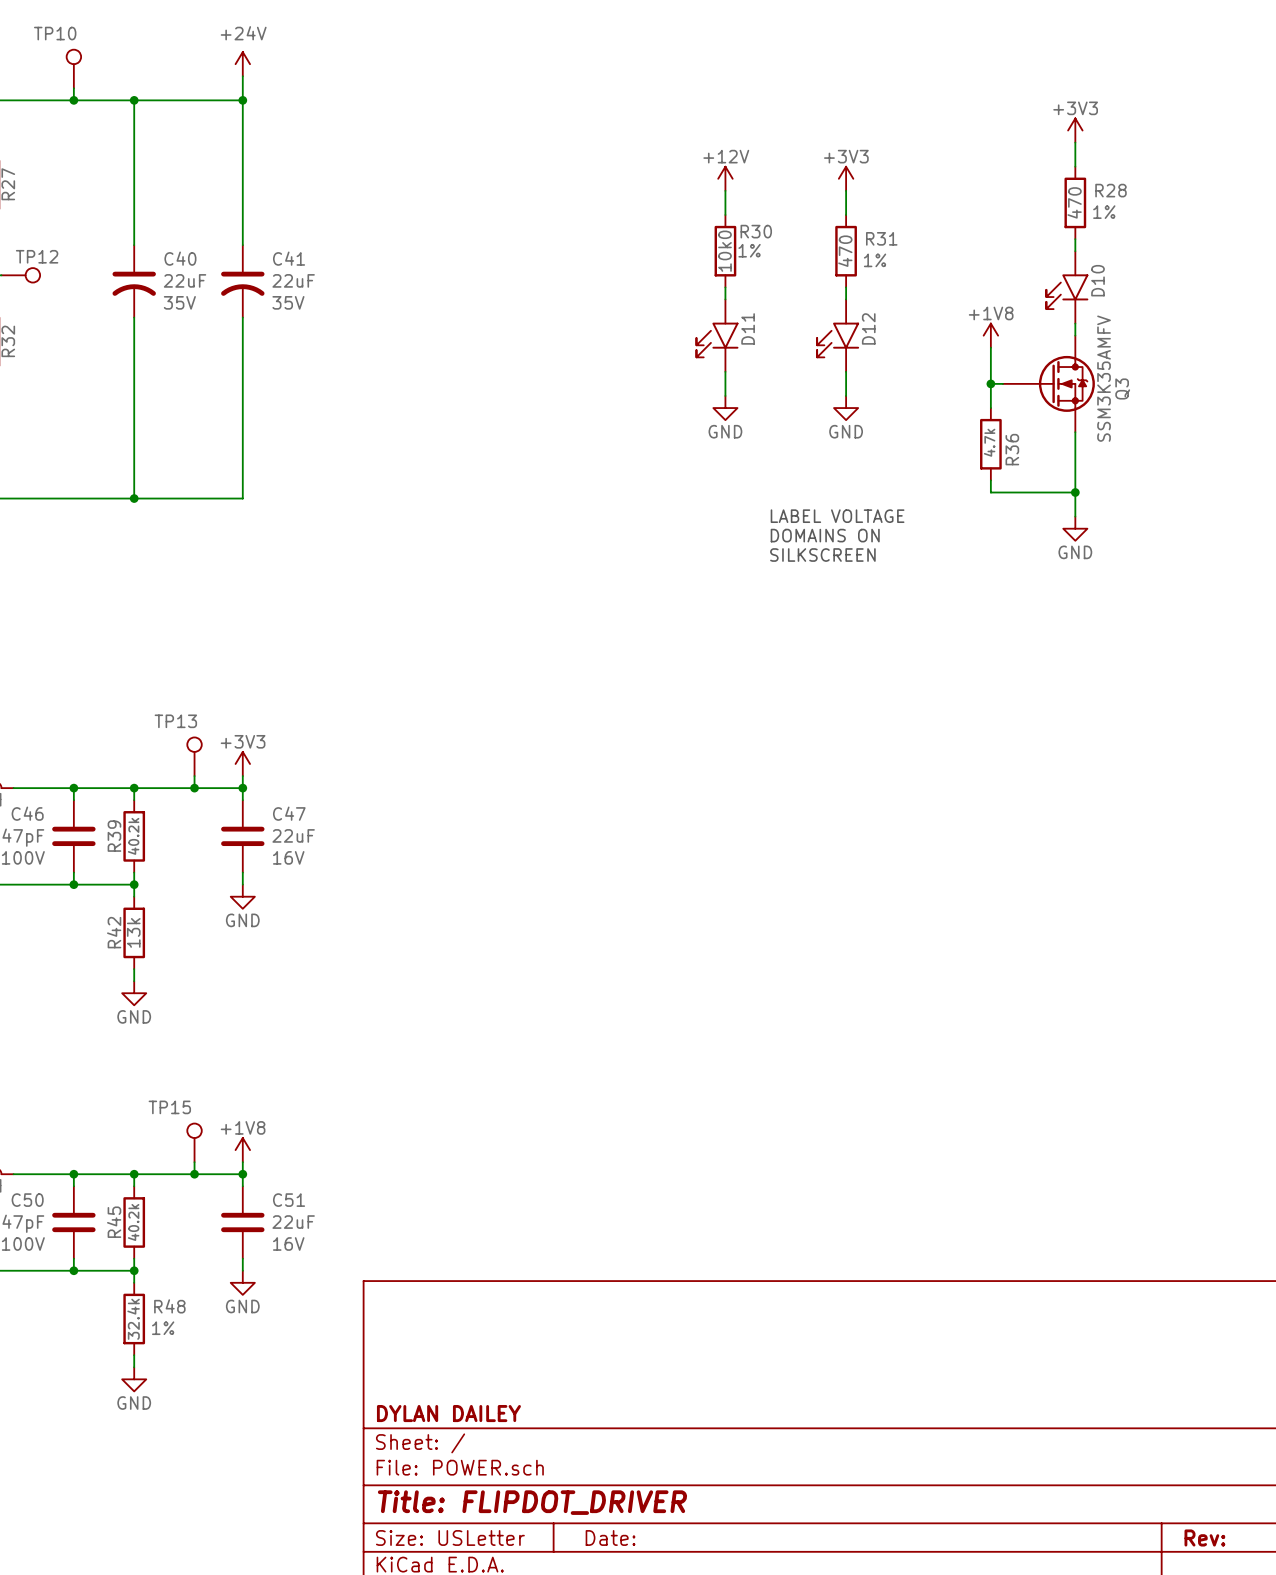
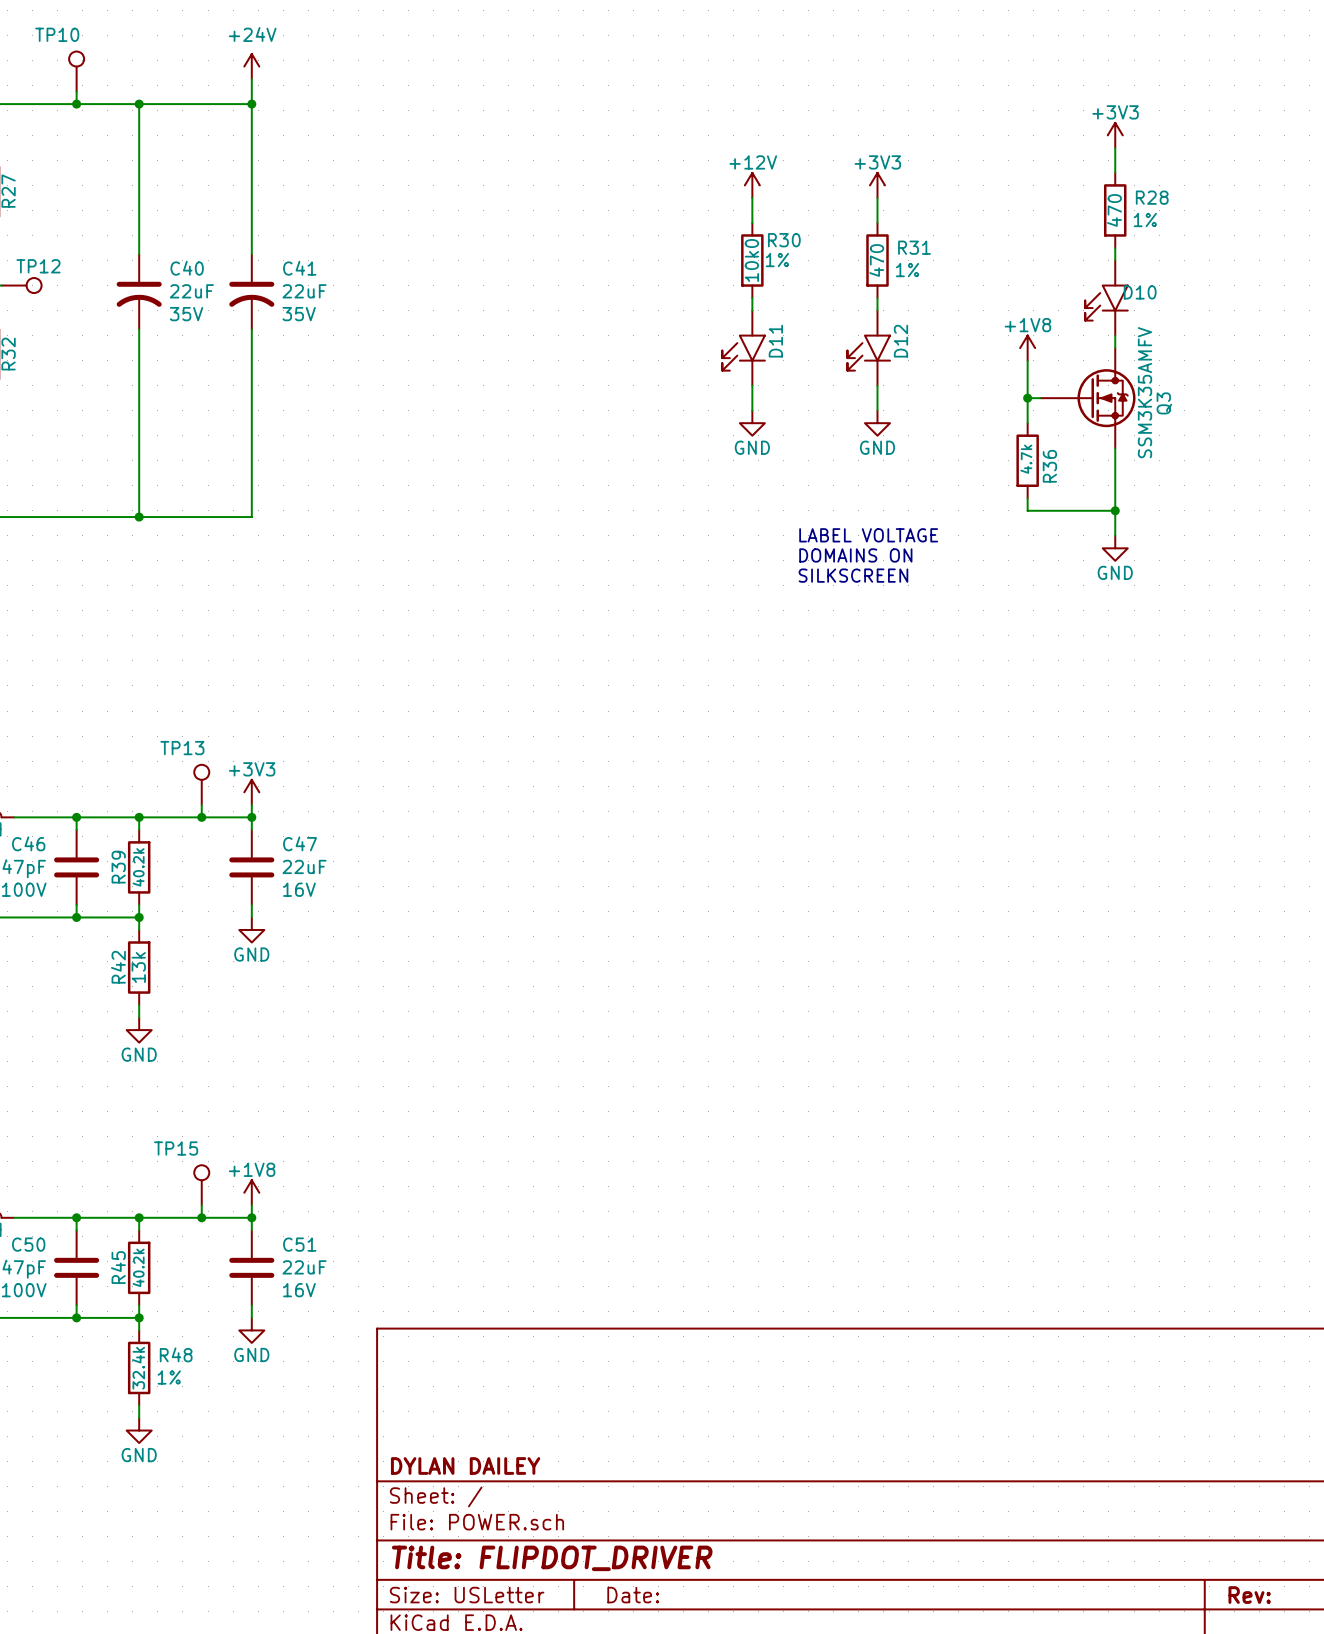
D10 name rotation: 0° (1098, 280) -> 90° clockwise (1140, 292)

